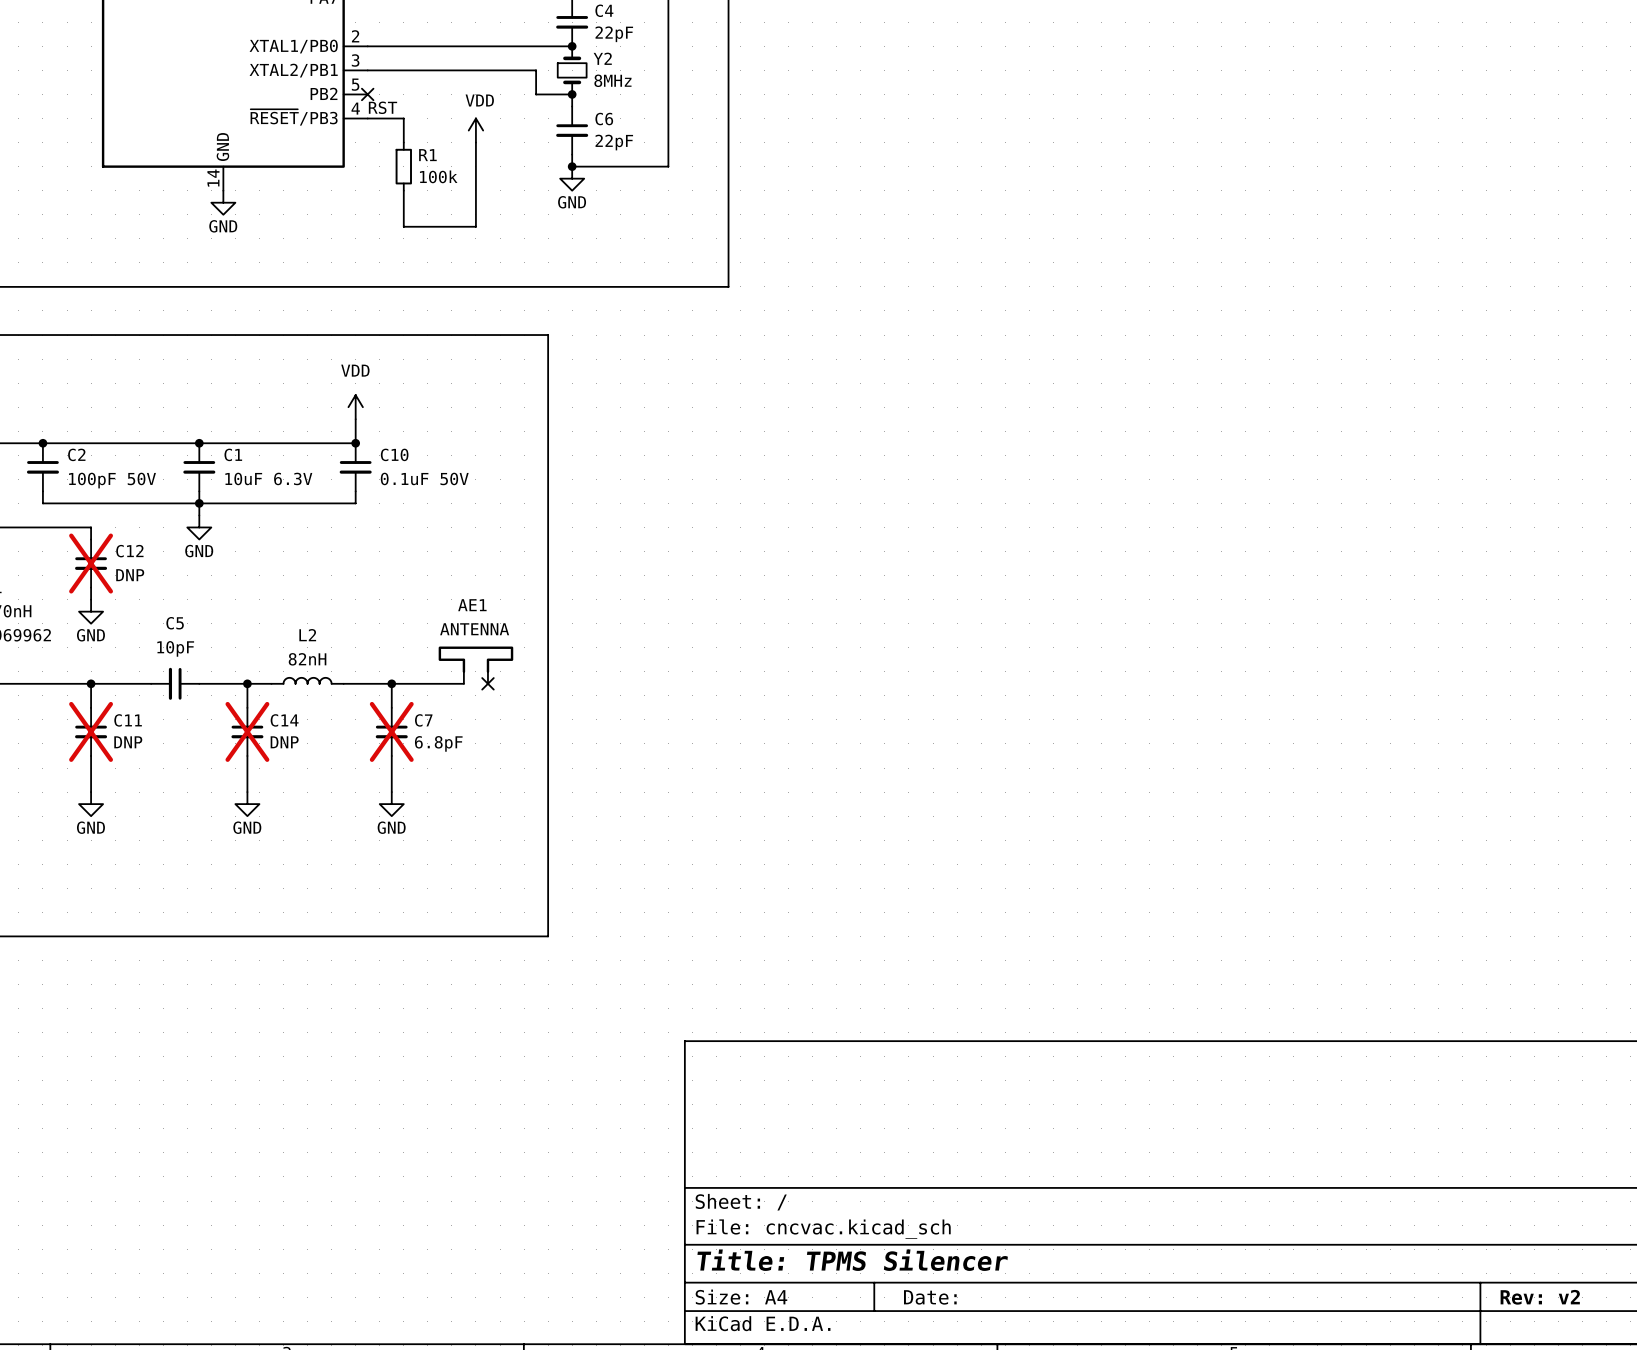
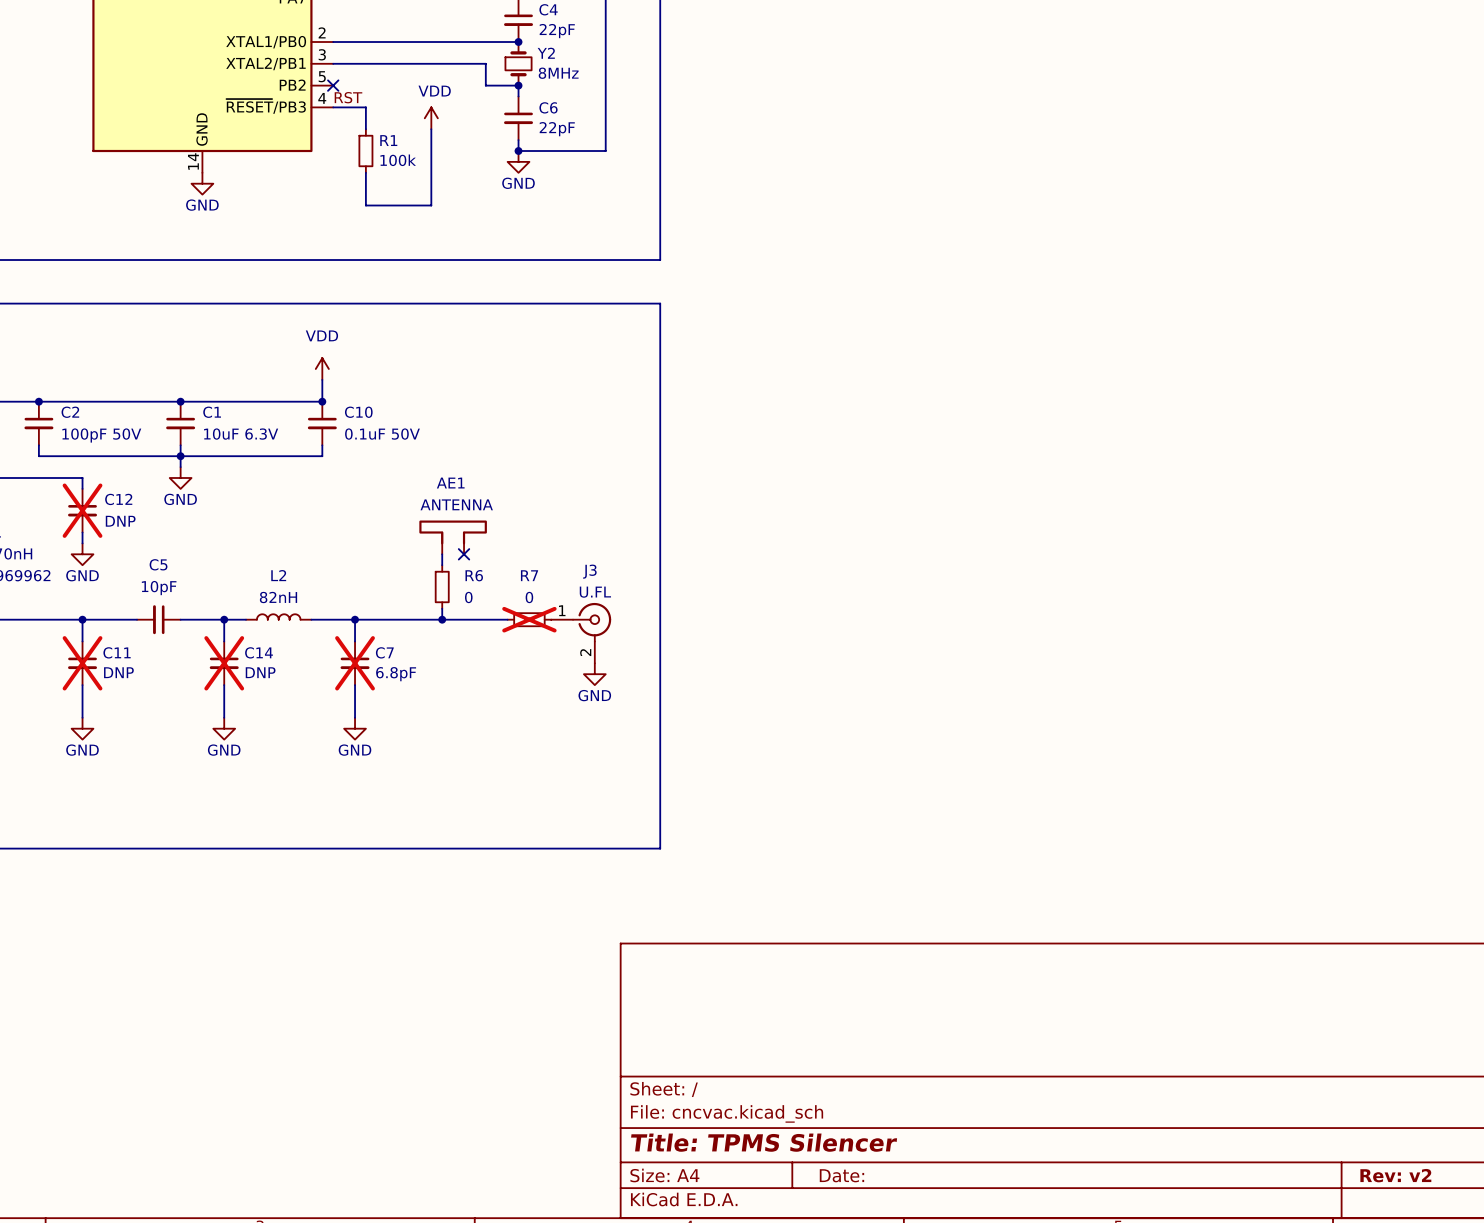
line: (548, 335) (548, 936) -> (496, 303) (660, 303) (660, 848) (496, 848)
wire: none -> (442, 554) (442, 565)
no-connect mark: none -> (464, 554)
R6: none -> 0 (442, 587)
AE1 position: (475, 665) -> (453, 537)
wire: none -> (420, 619) (507, 619)
no-connect mark: (487, 683) -> none
junction: none -> (442, 619)
R7: none -> 0 (529, 619)
J3: none -> U.FL (581, 633)
power symbol: none -> GND (594, 674)

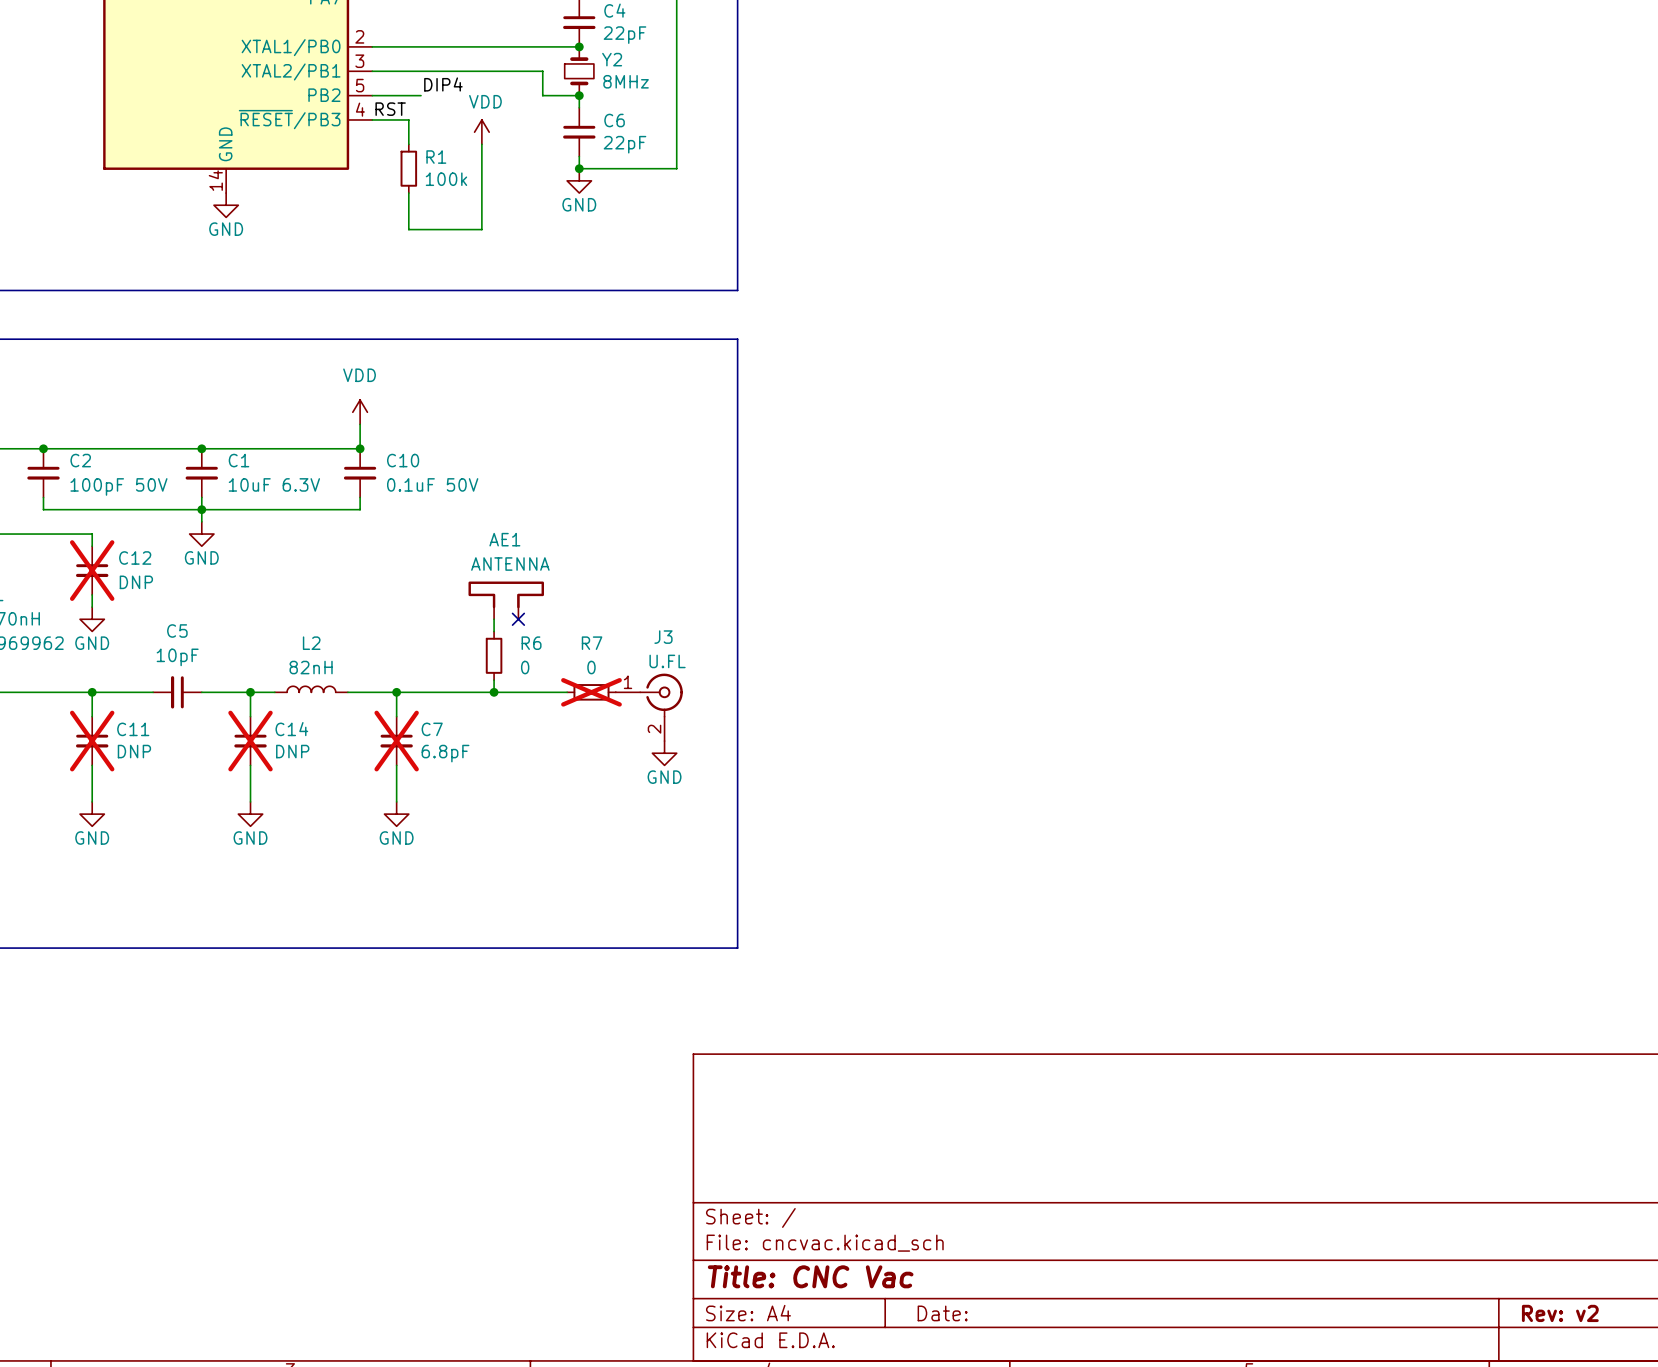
label: none -> DIP4 (443, 84)
wire: none -> (372, 95) (420, 95)
no-connect mark: (333, 85) -> none
title block: Title: TPMS Silencer (764, 1142) -> Title: CNC Vac (810, 1276)

